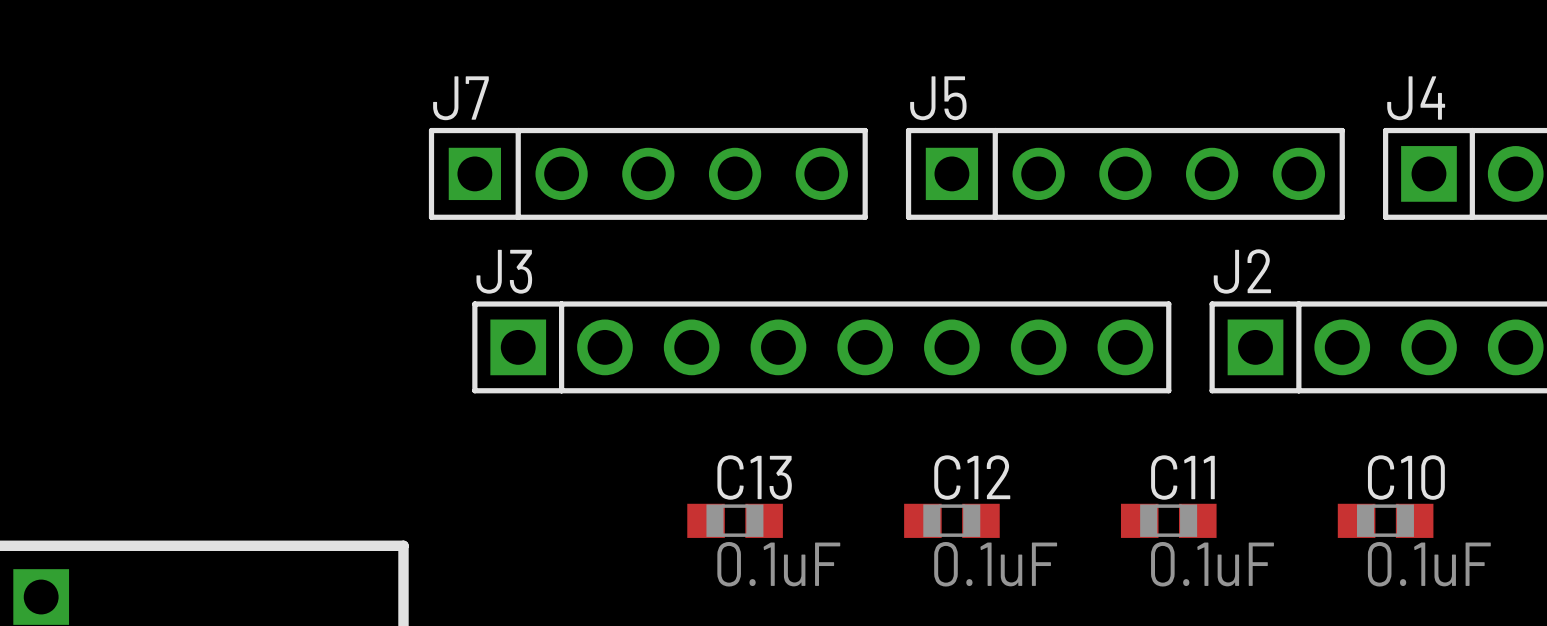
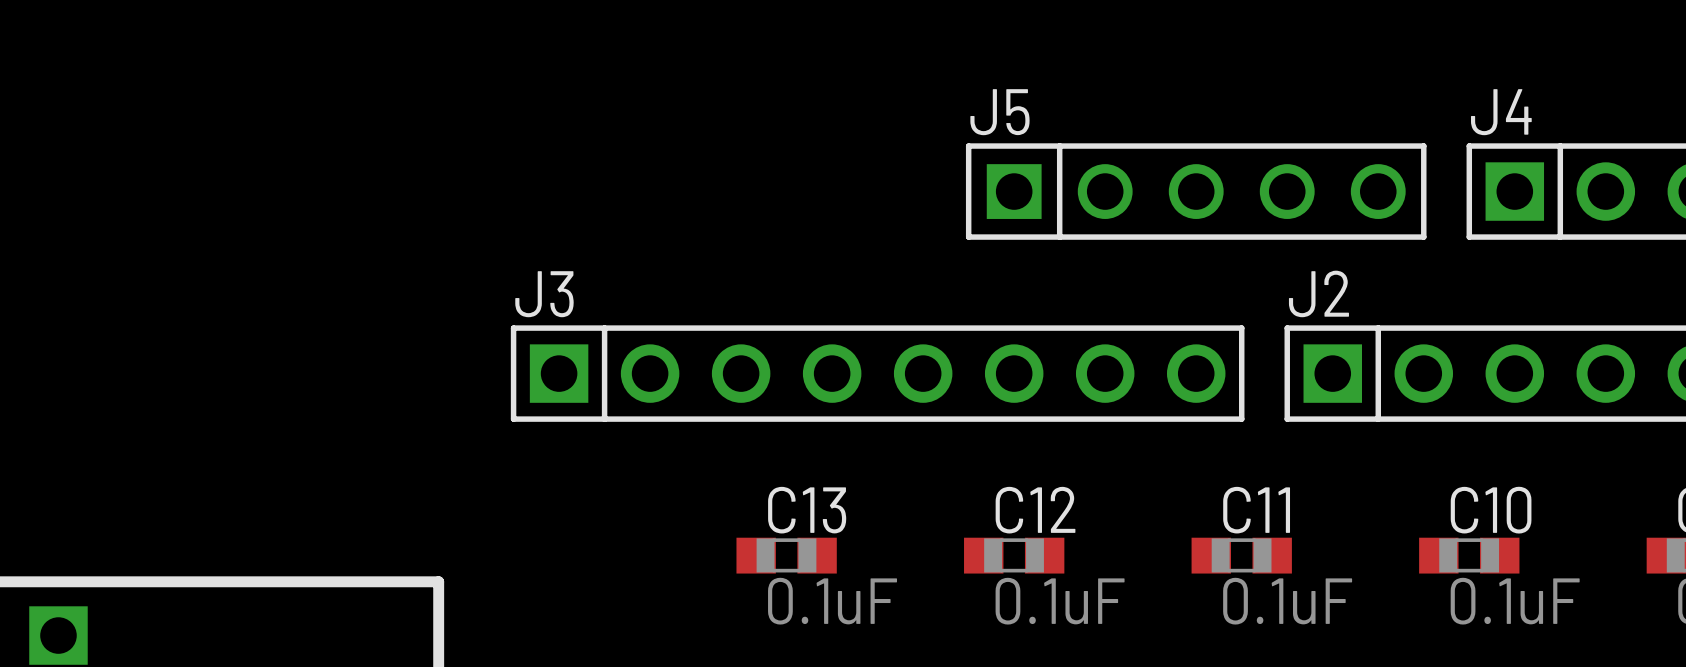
J7: (648, 173) -> none

